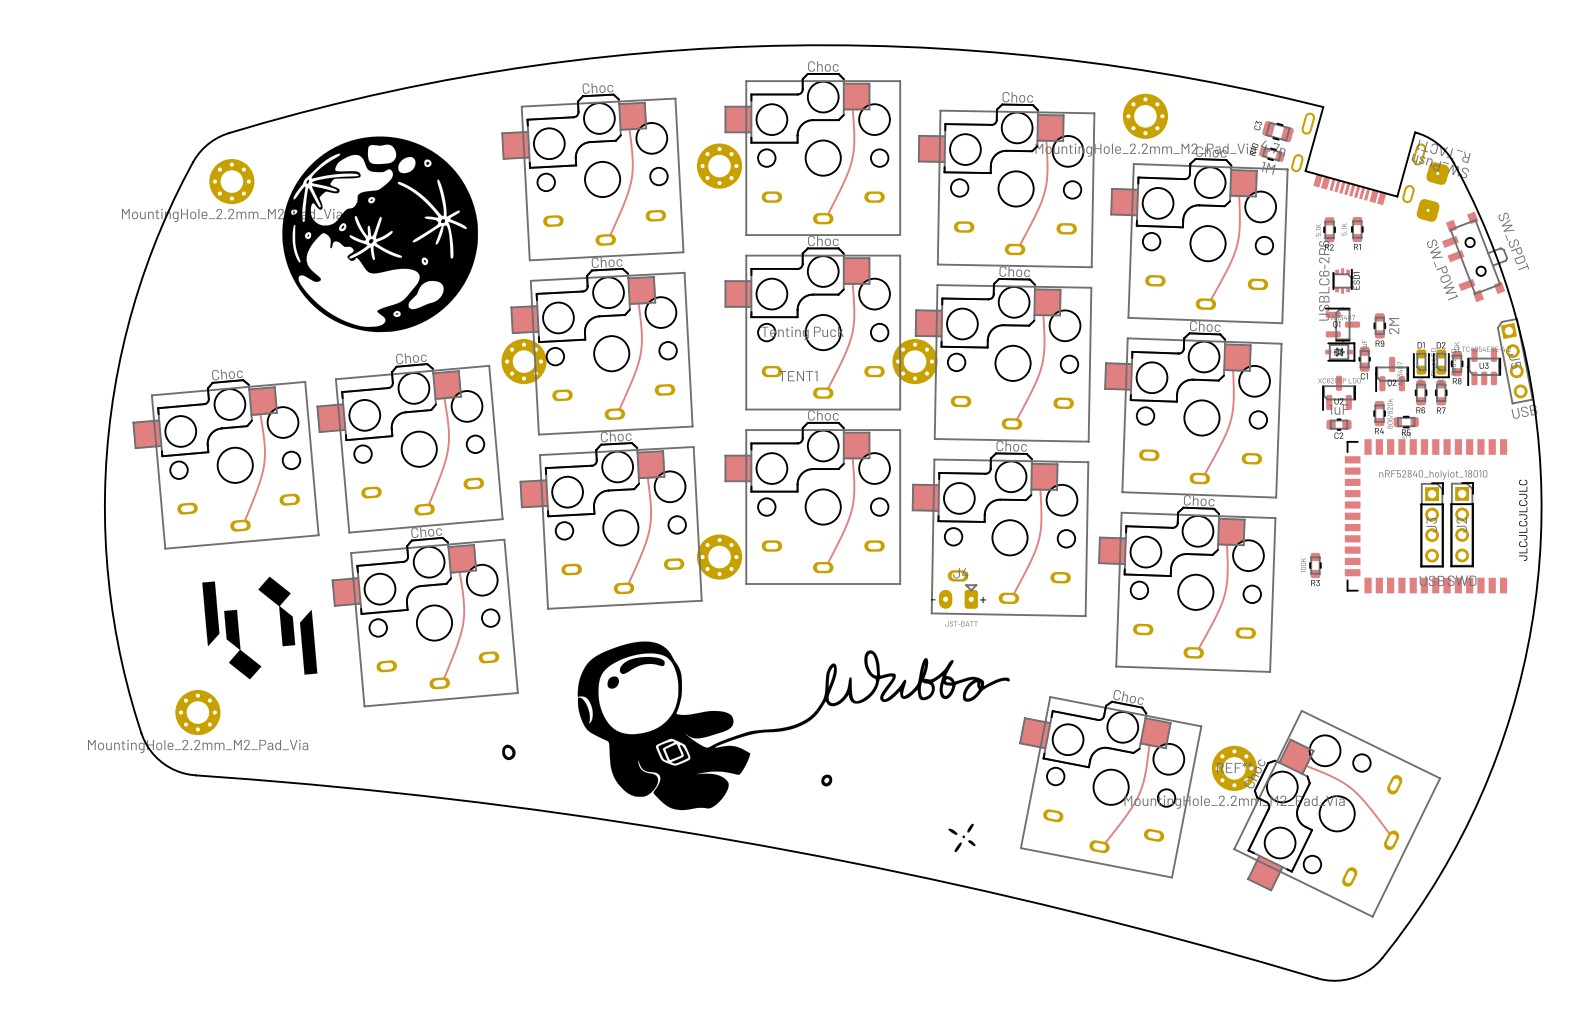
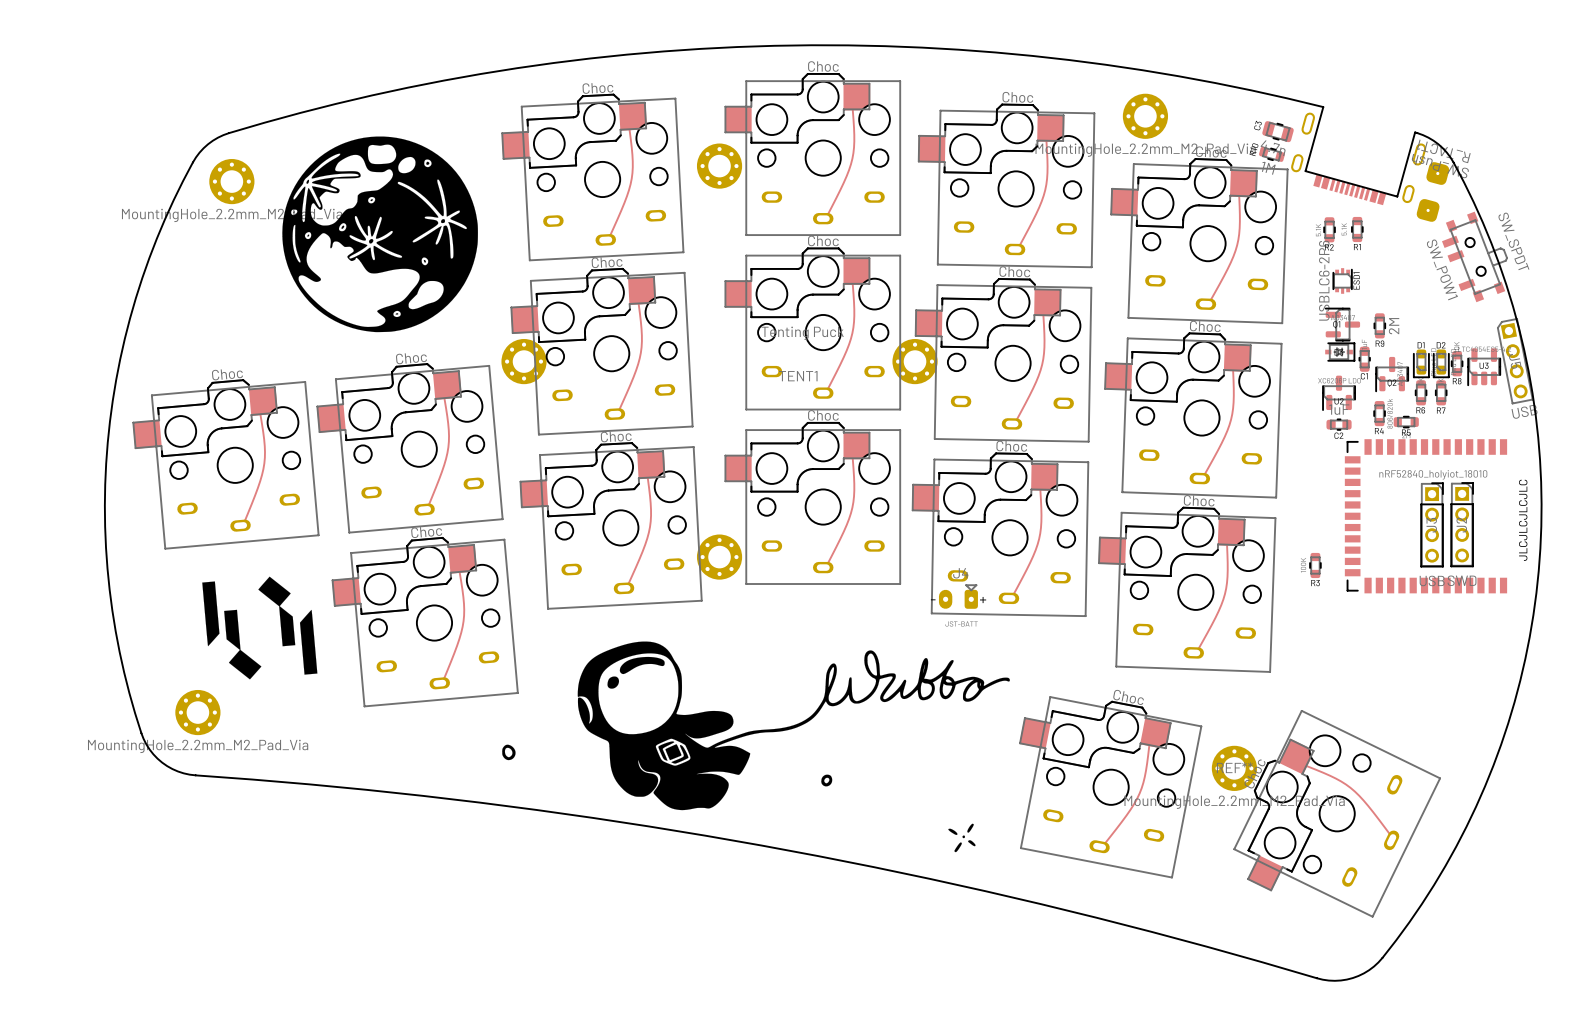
part footprint: [724, 73, 901, 236] -> [724, 73, 901, 236]
part footprint: [501, 93, 685, 262] -> [501, 93, 685, 262]
part footprint: [918, 103, 1096, 269] -> [918, 103, 1096, 269]
part footprint: [1110, 158, 1289, 325] -> [1110, 158, 1289, 325]
part footprint: [724, 247, 901, 411] -> [724, 247, 901, 411]
part footprint: [510, 268, 694, 436] -> [510, 268, 694, 436]
part footprint: [915, 278, 1093, 443] -> [915, 278, 1093, 443]
part footprint: [1104, 332, 1283, 499] -> [1104, 332, 1283, 499]
part footprint: [316, 363, 504, 534] -> [316, 363, 504, 534]
part footprint: [132, 379, 320, 550] -> [132, 379, 320, 550]
part footprint: [724, 422, 901, 585] -> [724, 422, 901, 585]
part footprint: [519, 442, 703, 610] -> [519, 442, 703, 610]
part footprint: [912, 452, 1090, 617] -> [912, 452, 1090, 617]
part footprint: [1098, 506, 1277, 673] -> [1098, 506, 1277, 673]
part footprint: [331, 537, 519, 708] -> [331, 537, 519, 708]
part footprint: [1019, 696, 1203, 879] -> [1019, 696, 1203, 879]
part footprint: [1233, 710, 1441, 918] -> [1233, 710, 1441, 918]

